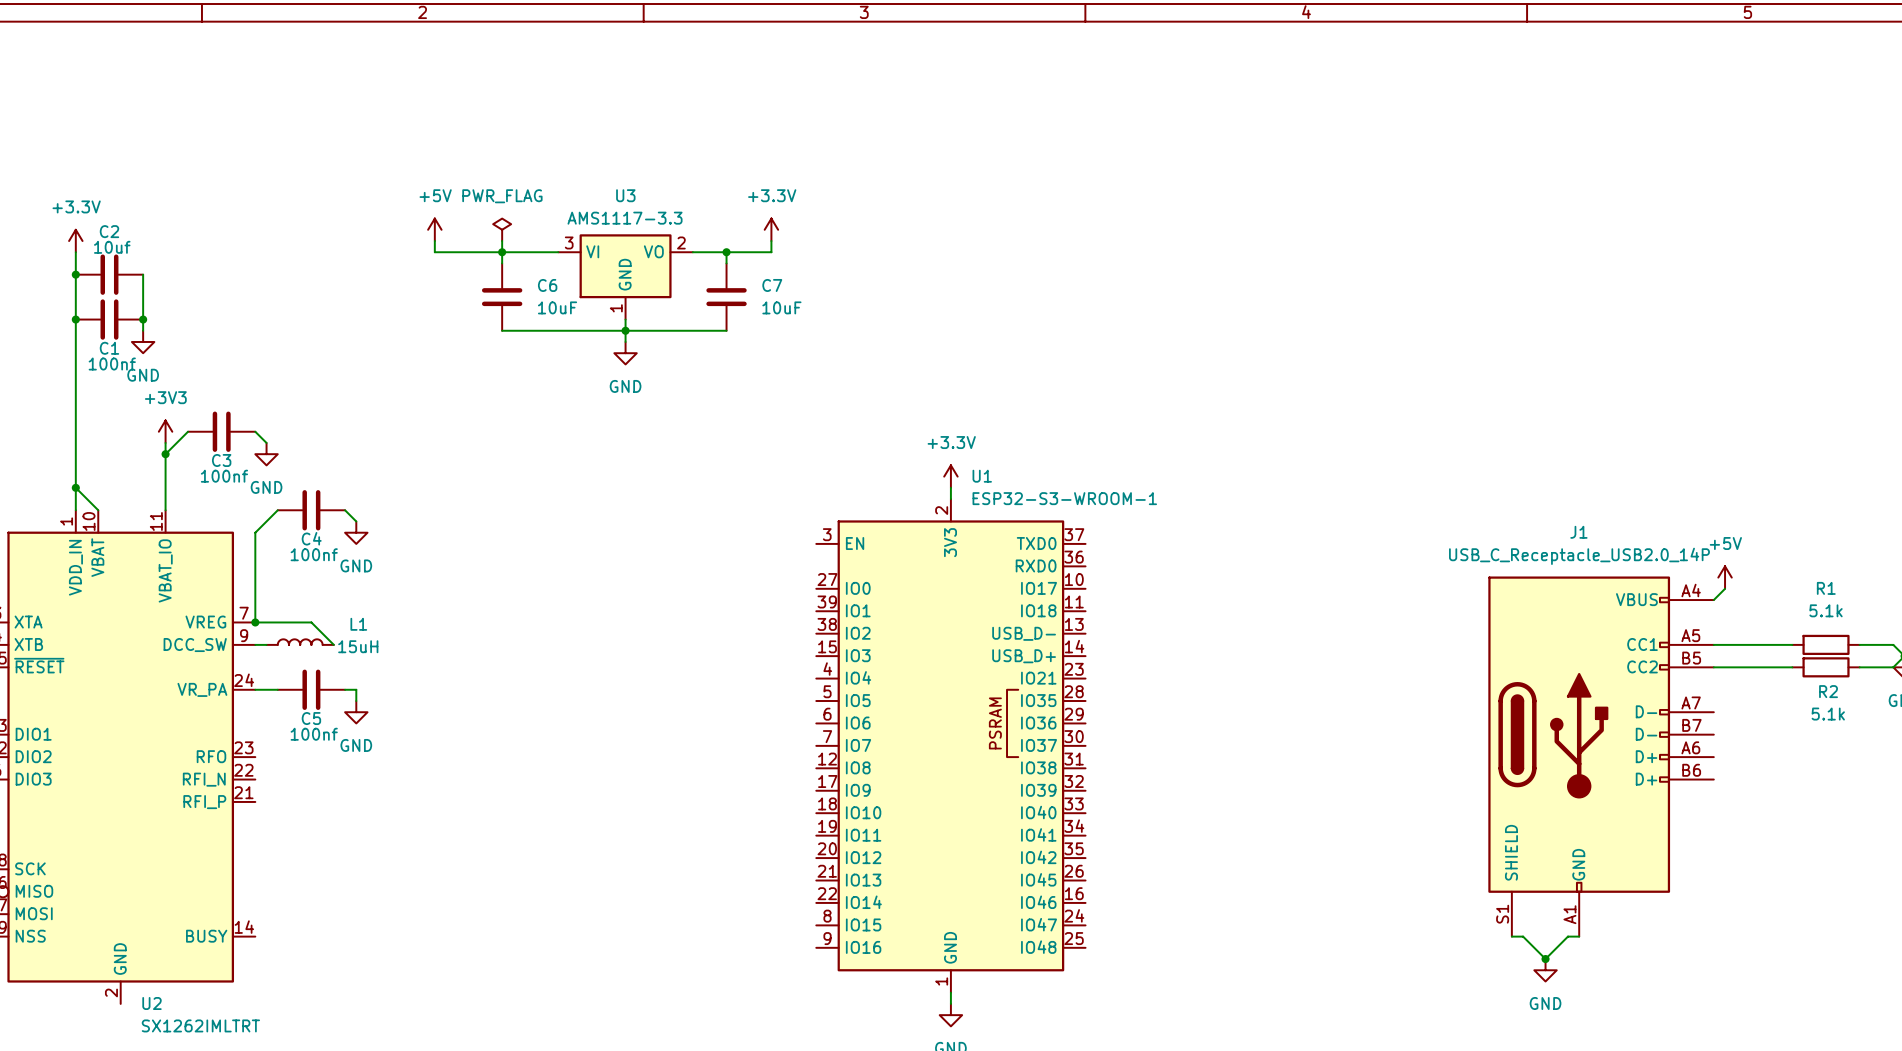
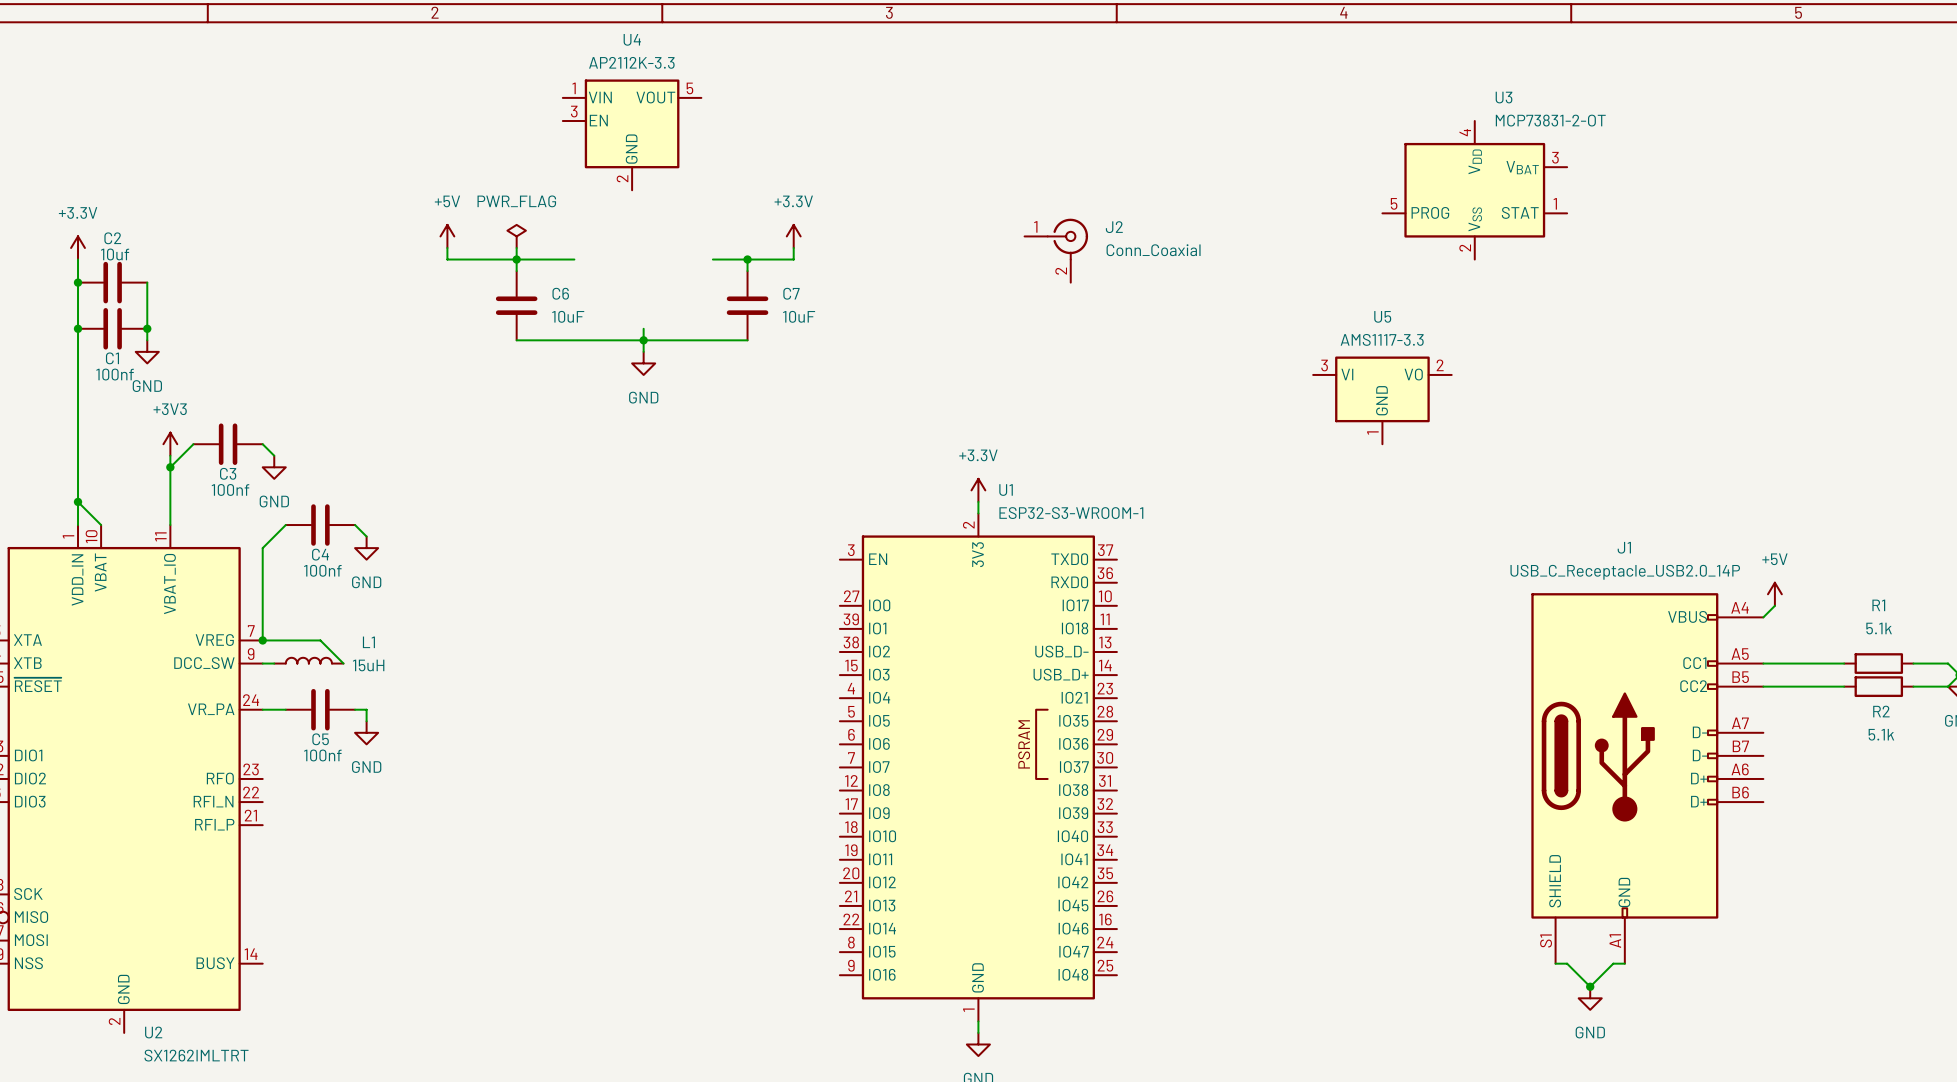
U4: none -> AP2112K-3.3 (632, 134)
U3 name position: U3 (625, 195) -> U3 (1504, 97)
U3 value: AMS1117-3.3 (625, 218) -> MCP73831-2-OT (1550, 120)
U3 symbol: [558, 234, 693, 320] -> [1382, 121, 1568, 260]
J2: none -> Conn_Coaxial (1056, 250)
U5: none -> AMS1117-3.3 (1382, 400)

